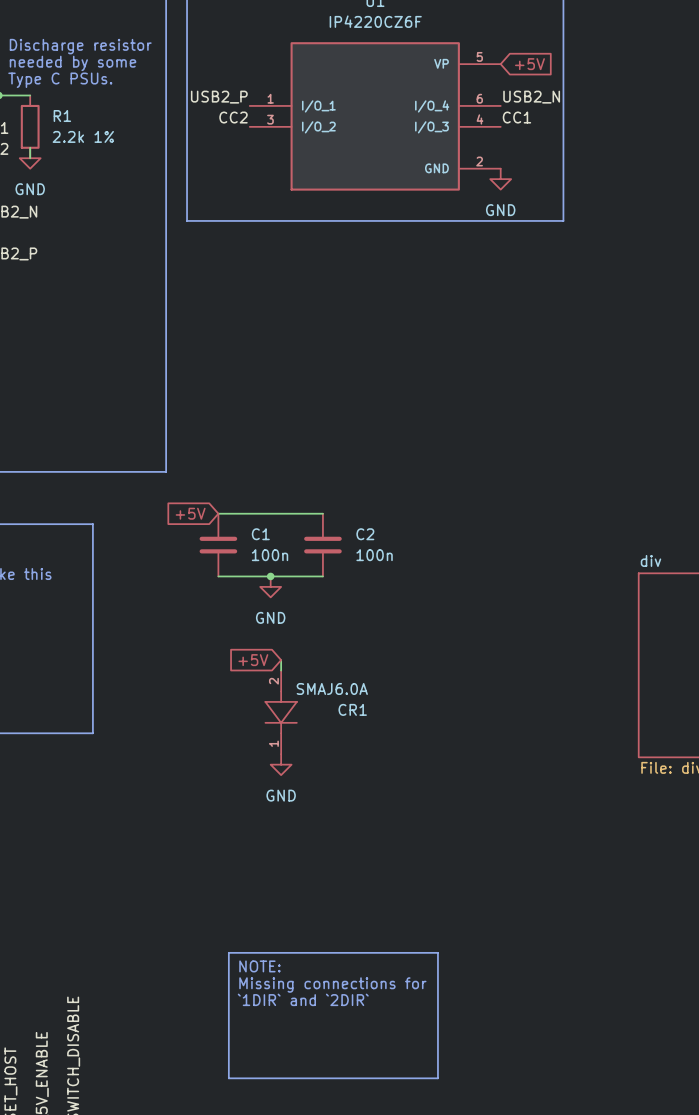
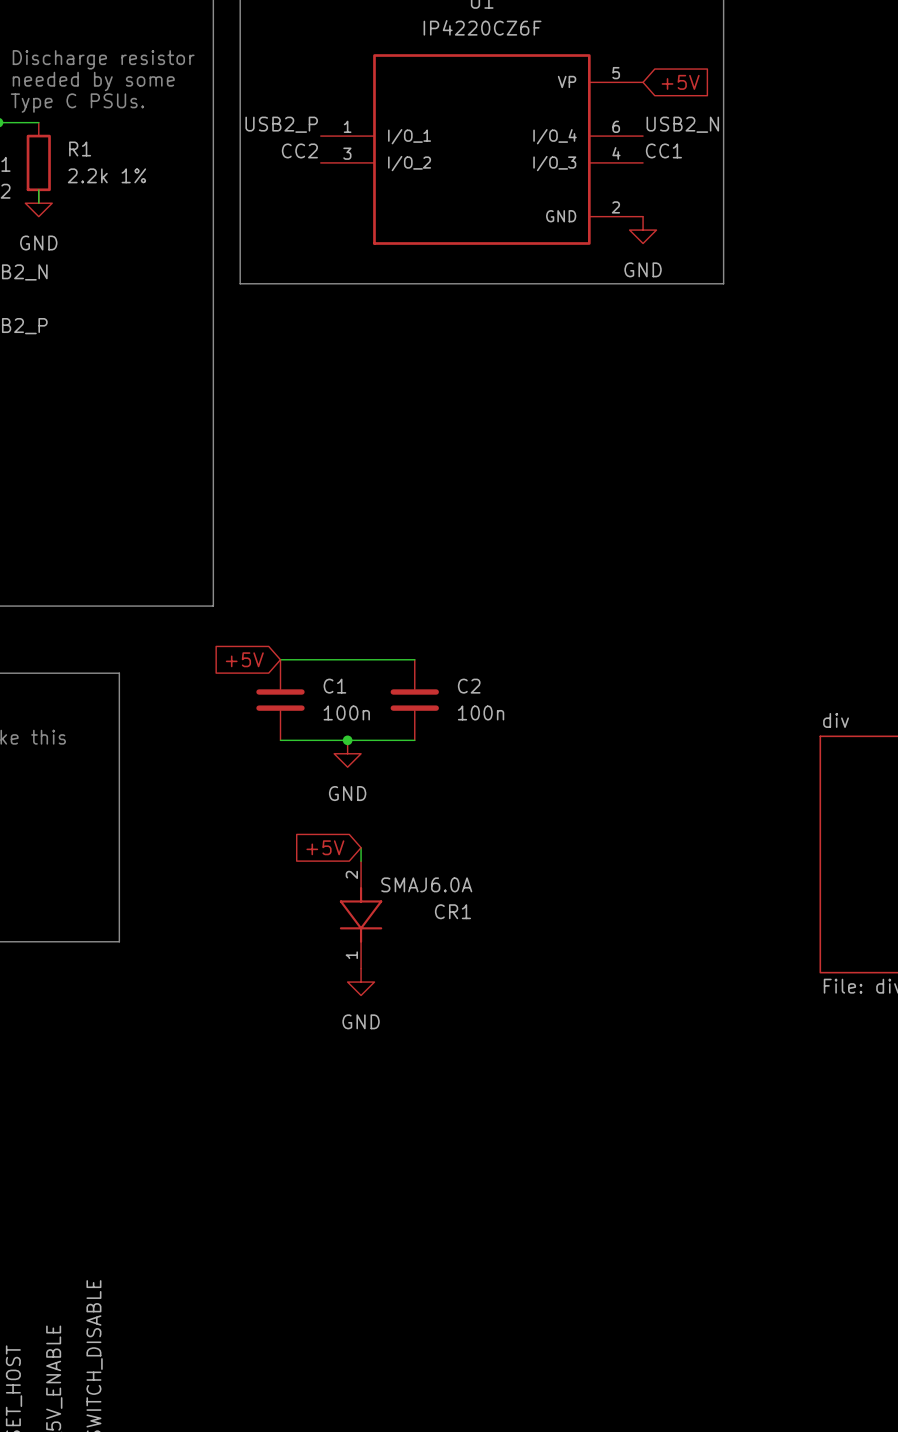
line: (228, 952) (437, 952) (437, 1078) (228, 1078) (228, 952) -> none
text: NOTE: (259, 966) -> none
text: Missing connections for (332, 985) -> none
text: `1DIR` and `2DIR` (303, 999) -> none

